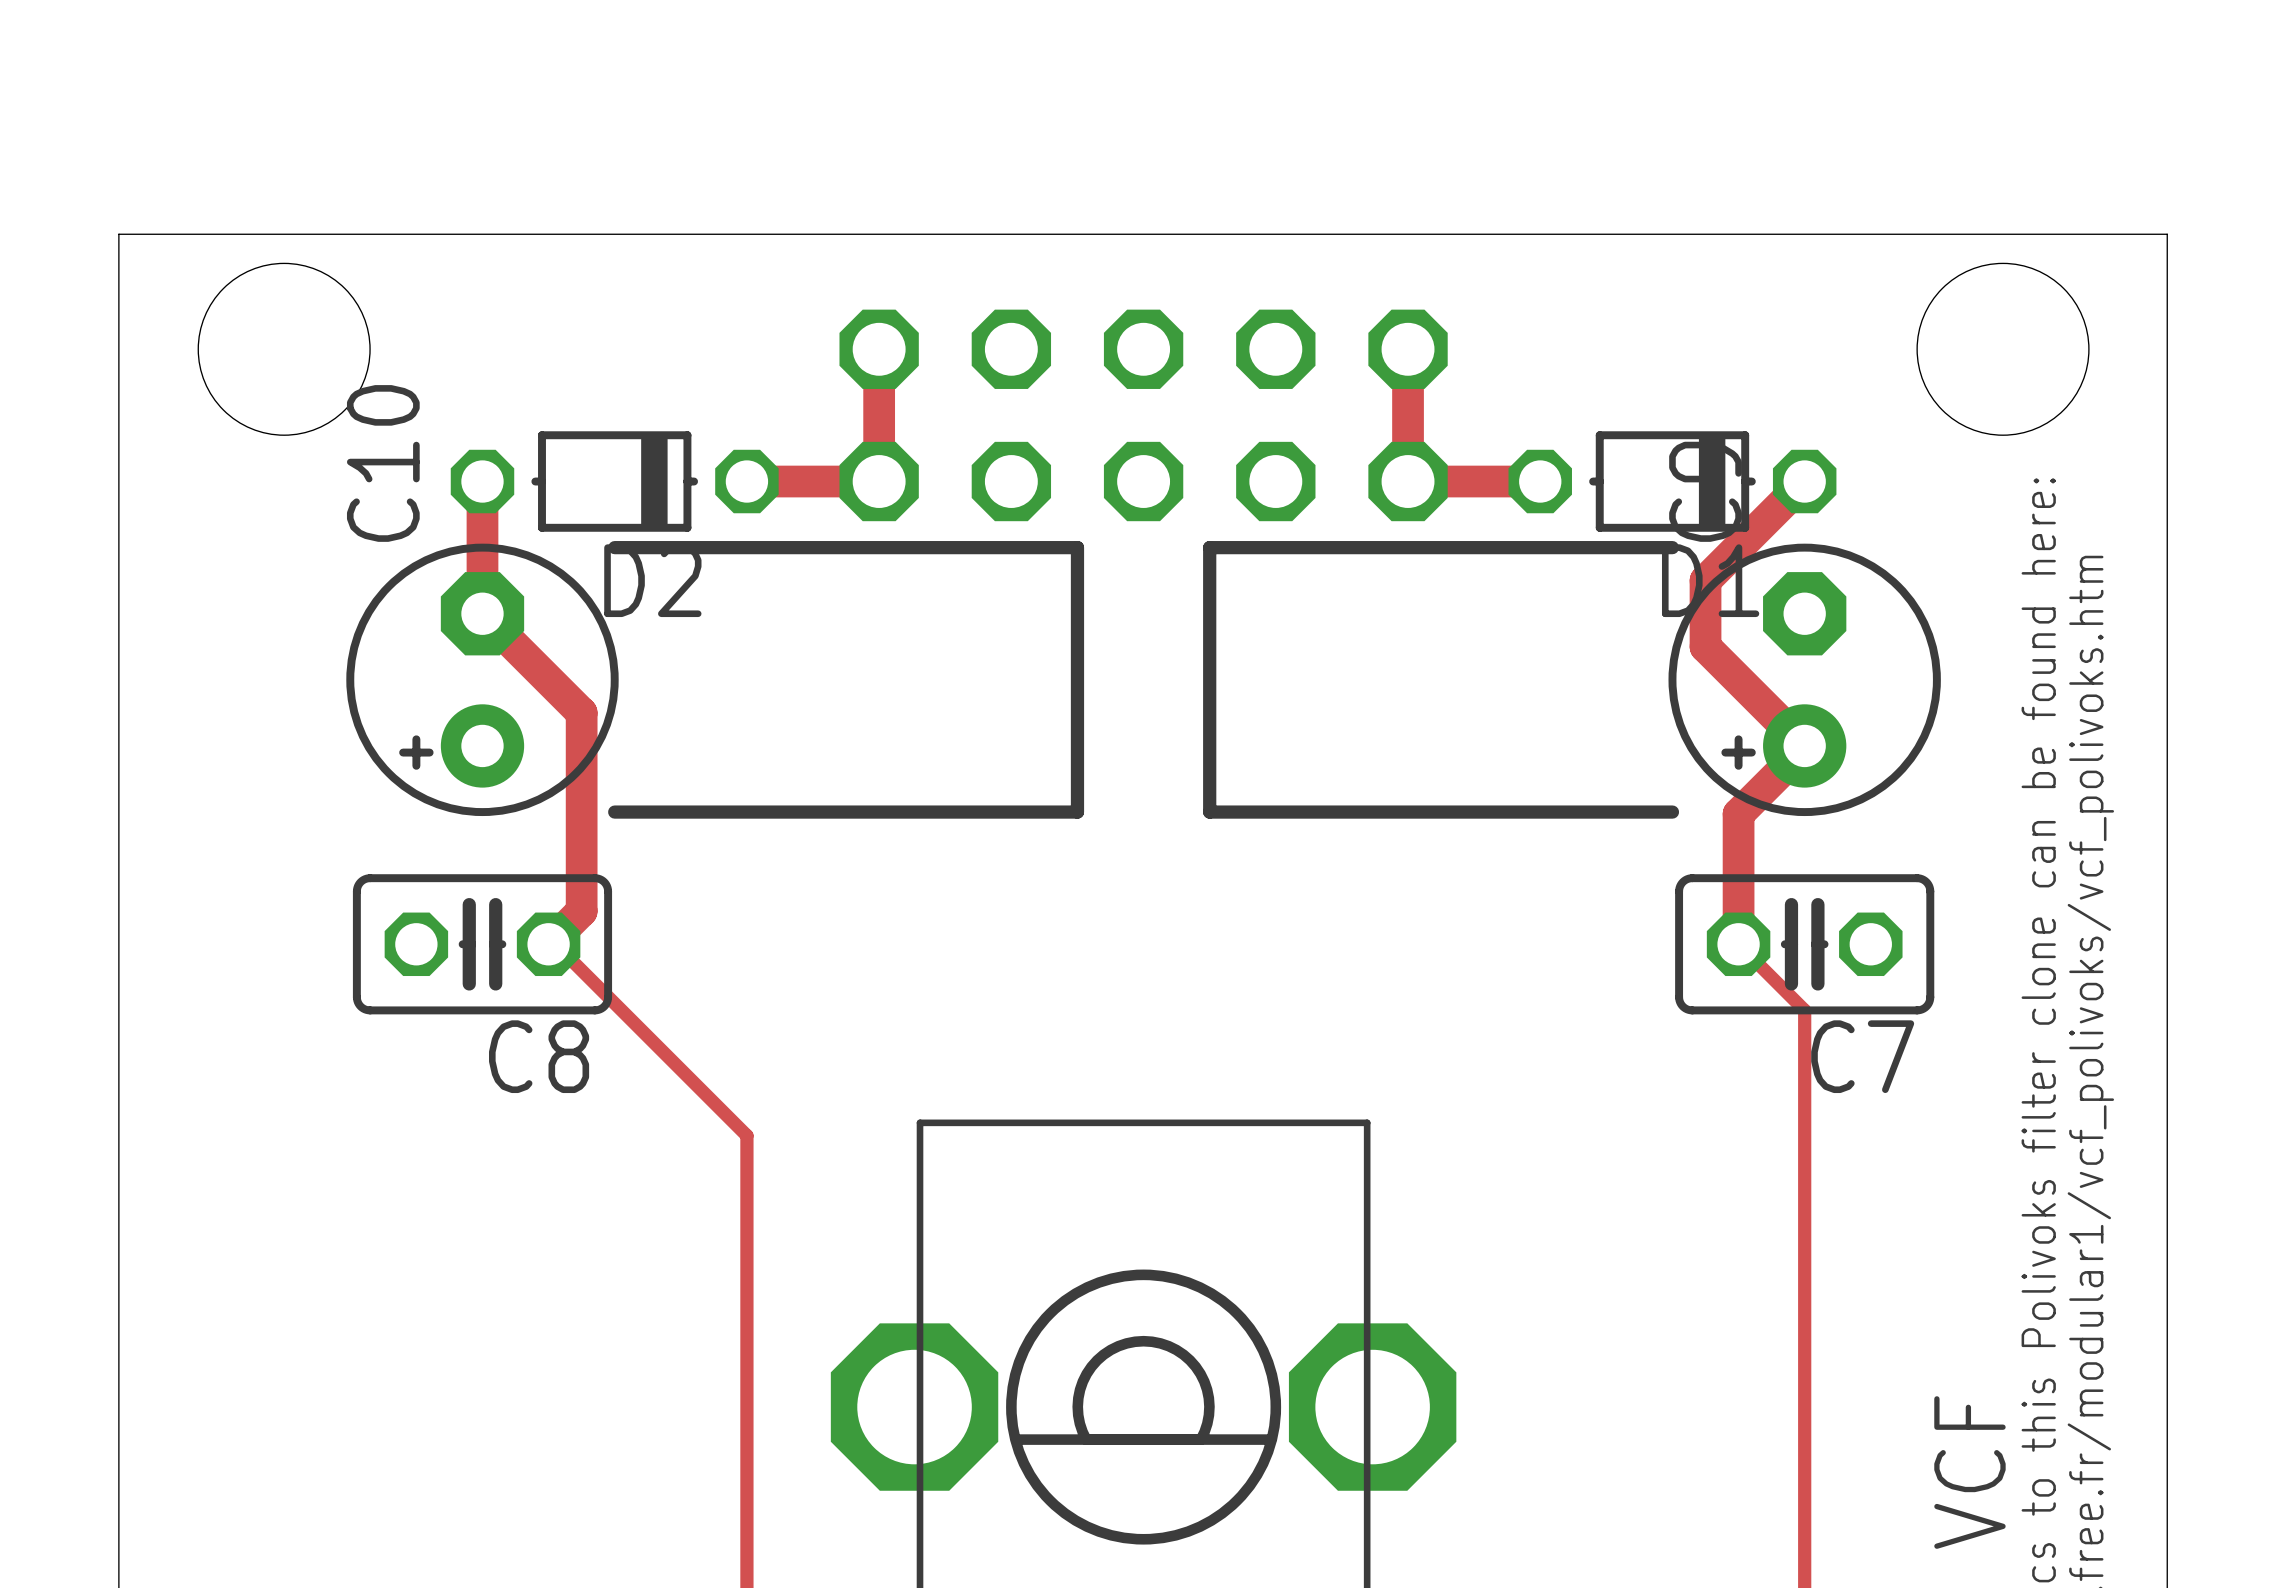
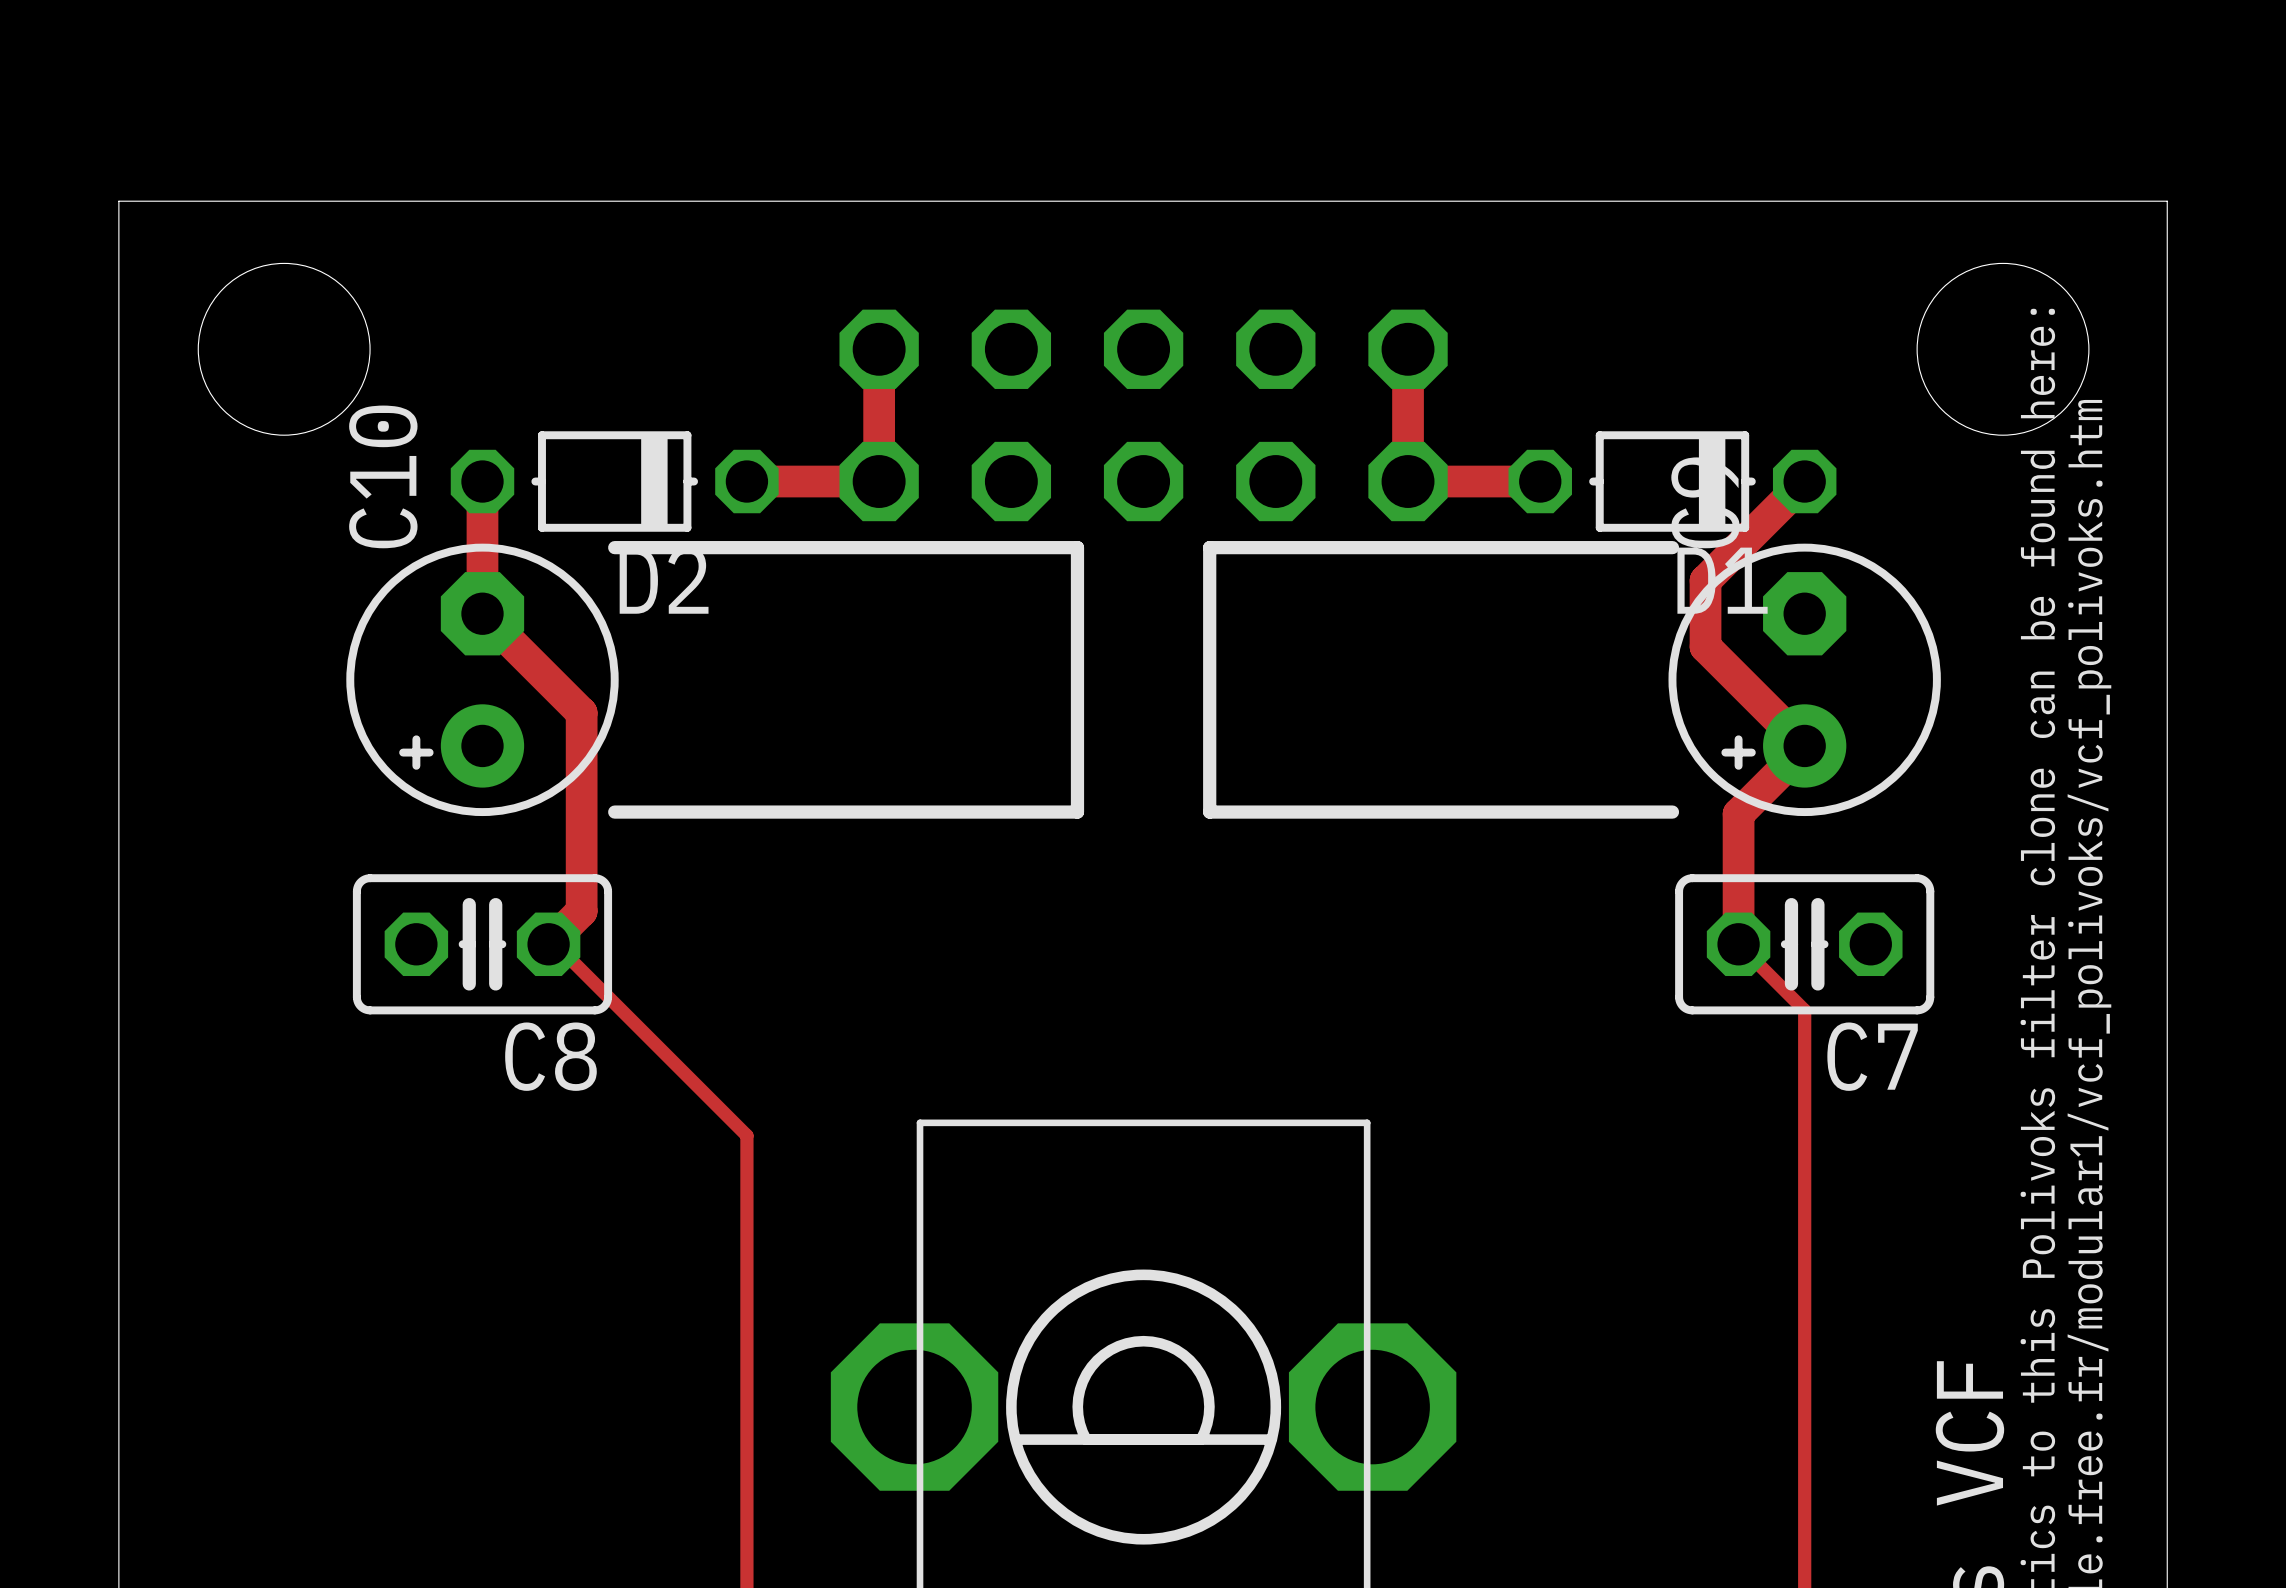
board edge: (118, 234) (2167, 234) -> (118, 234) (118, 201) (2167, 201) (2167, 234)

